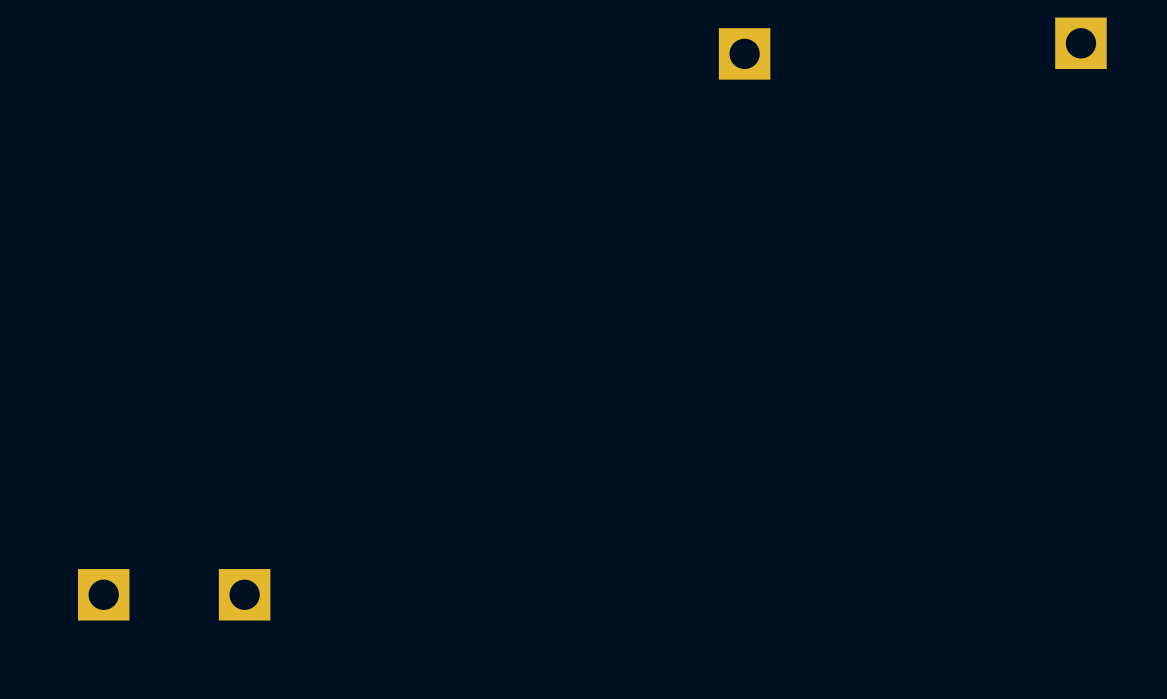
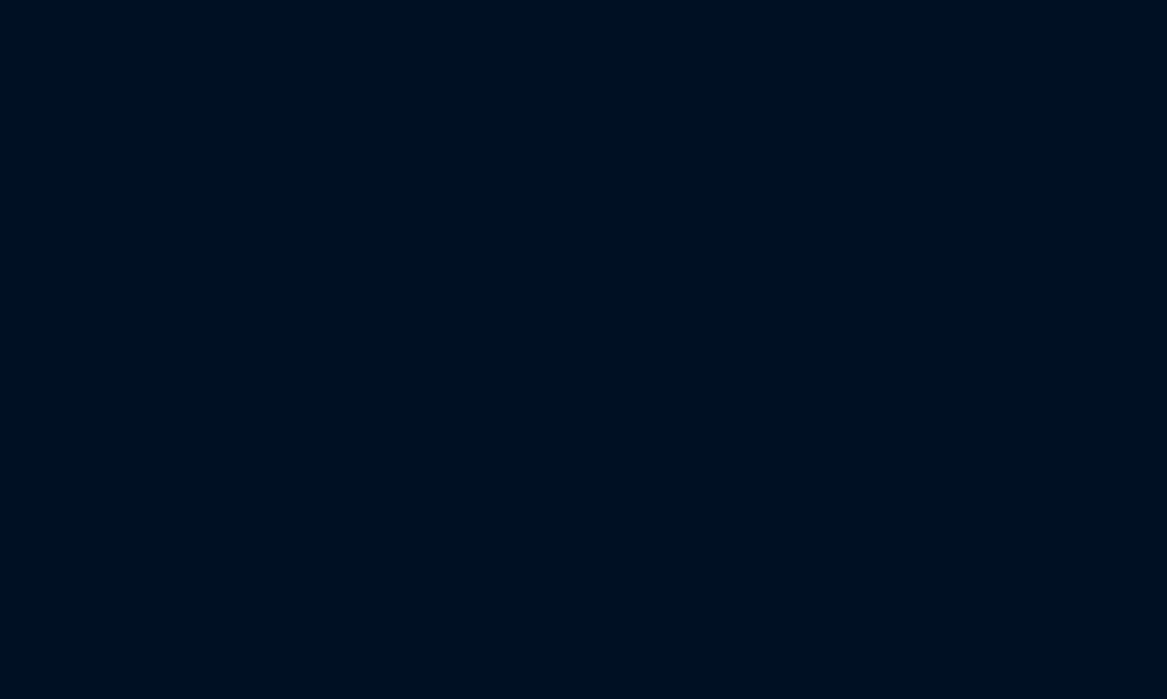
part: (1080, 43) -> none
part: (744, 53) -> none
part: (103, 594) -> none
part: (244, 594) -> none

